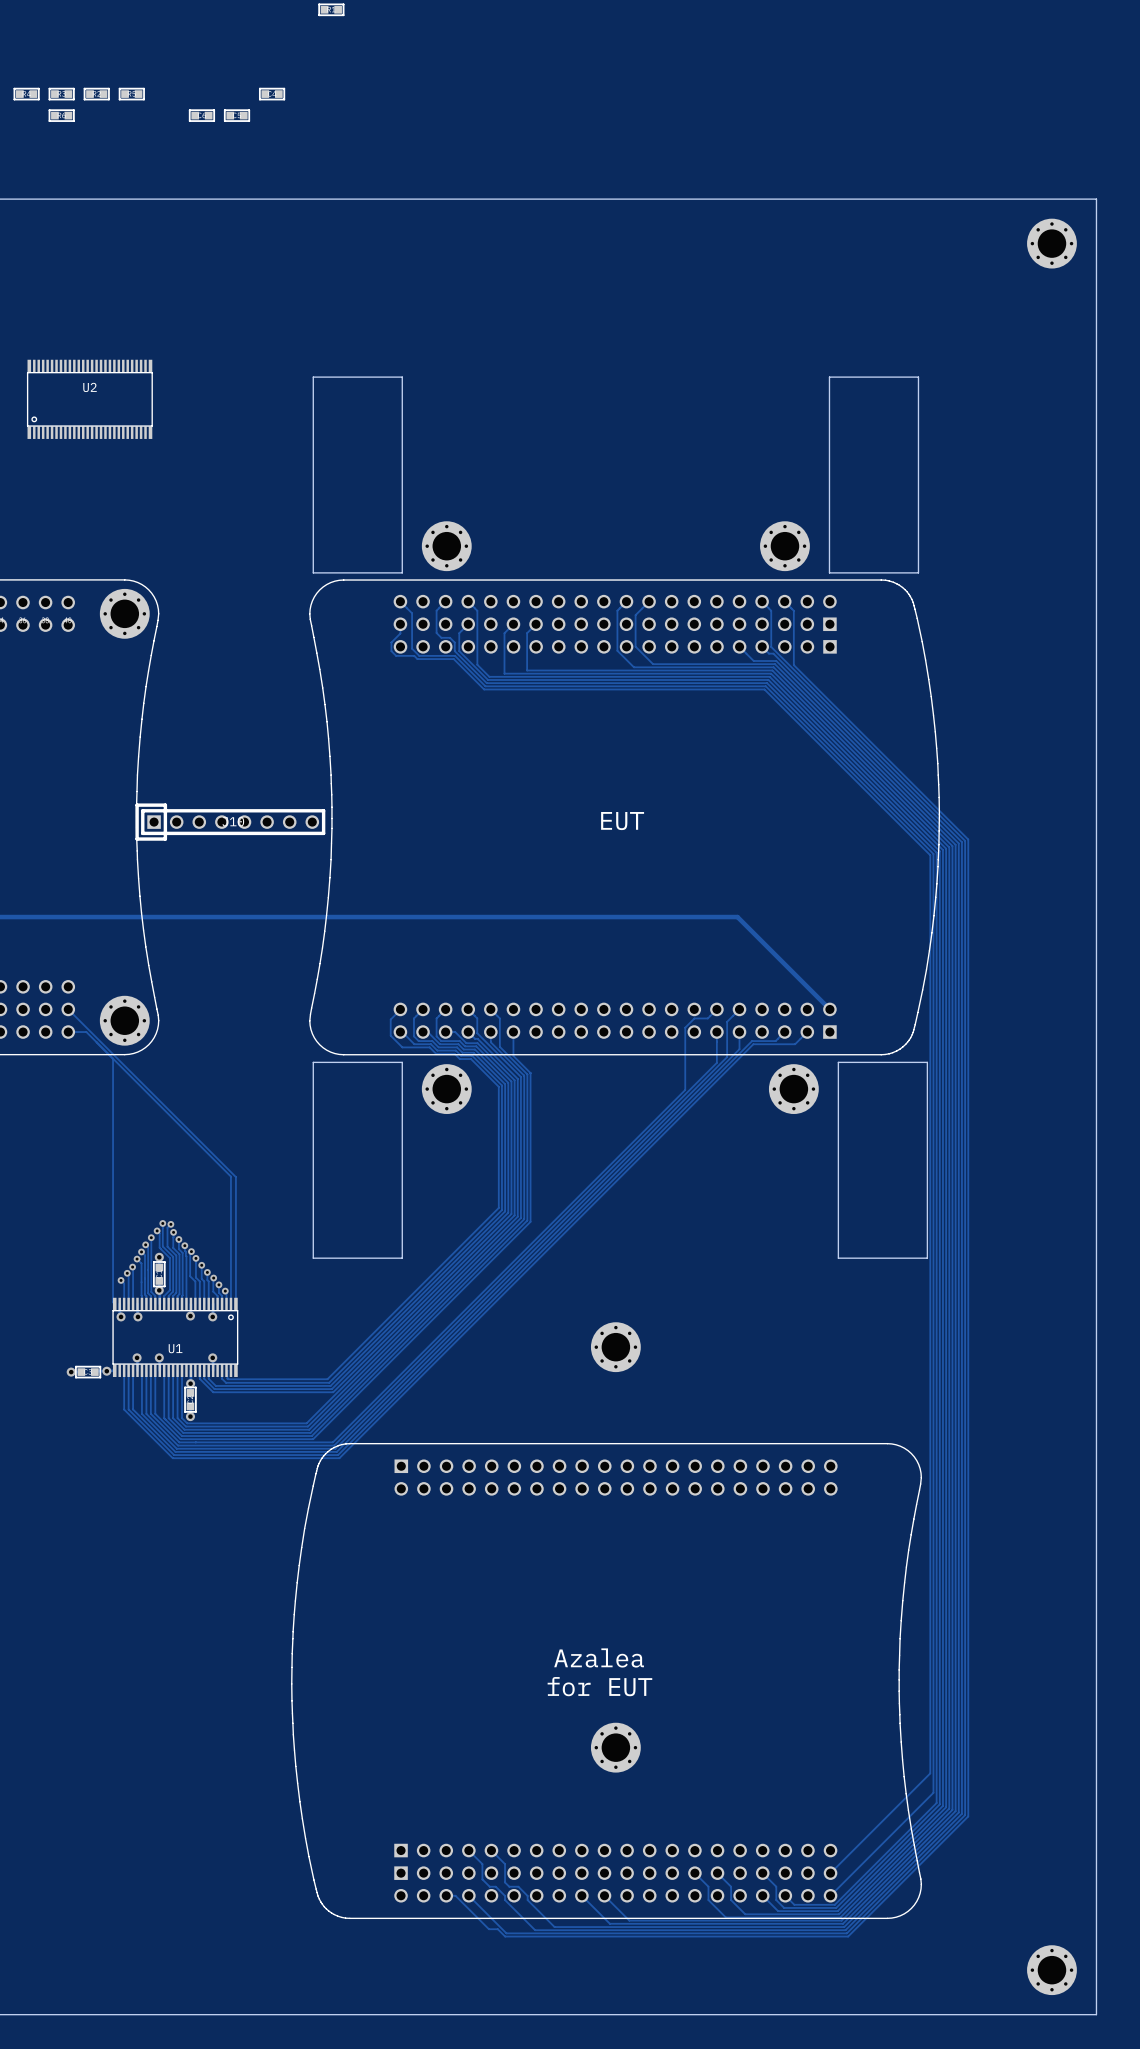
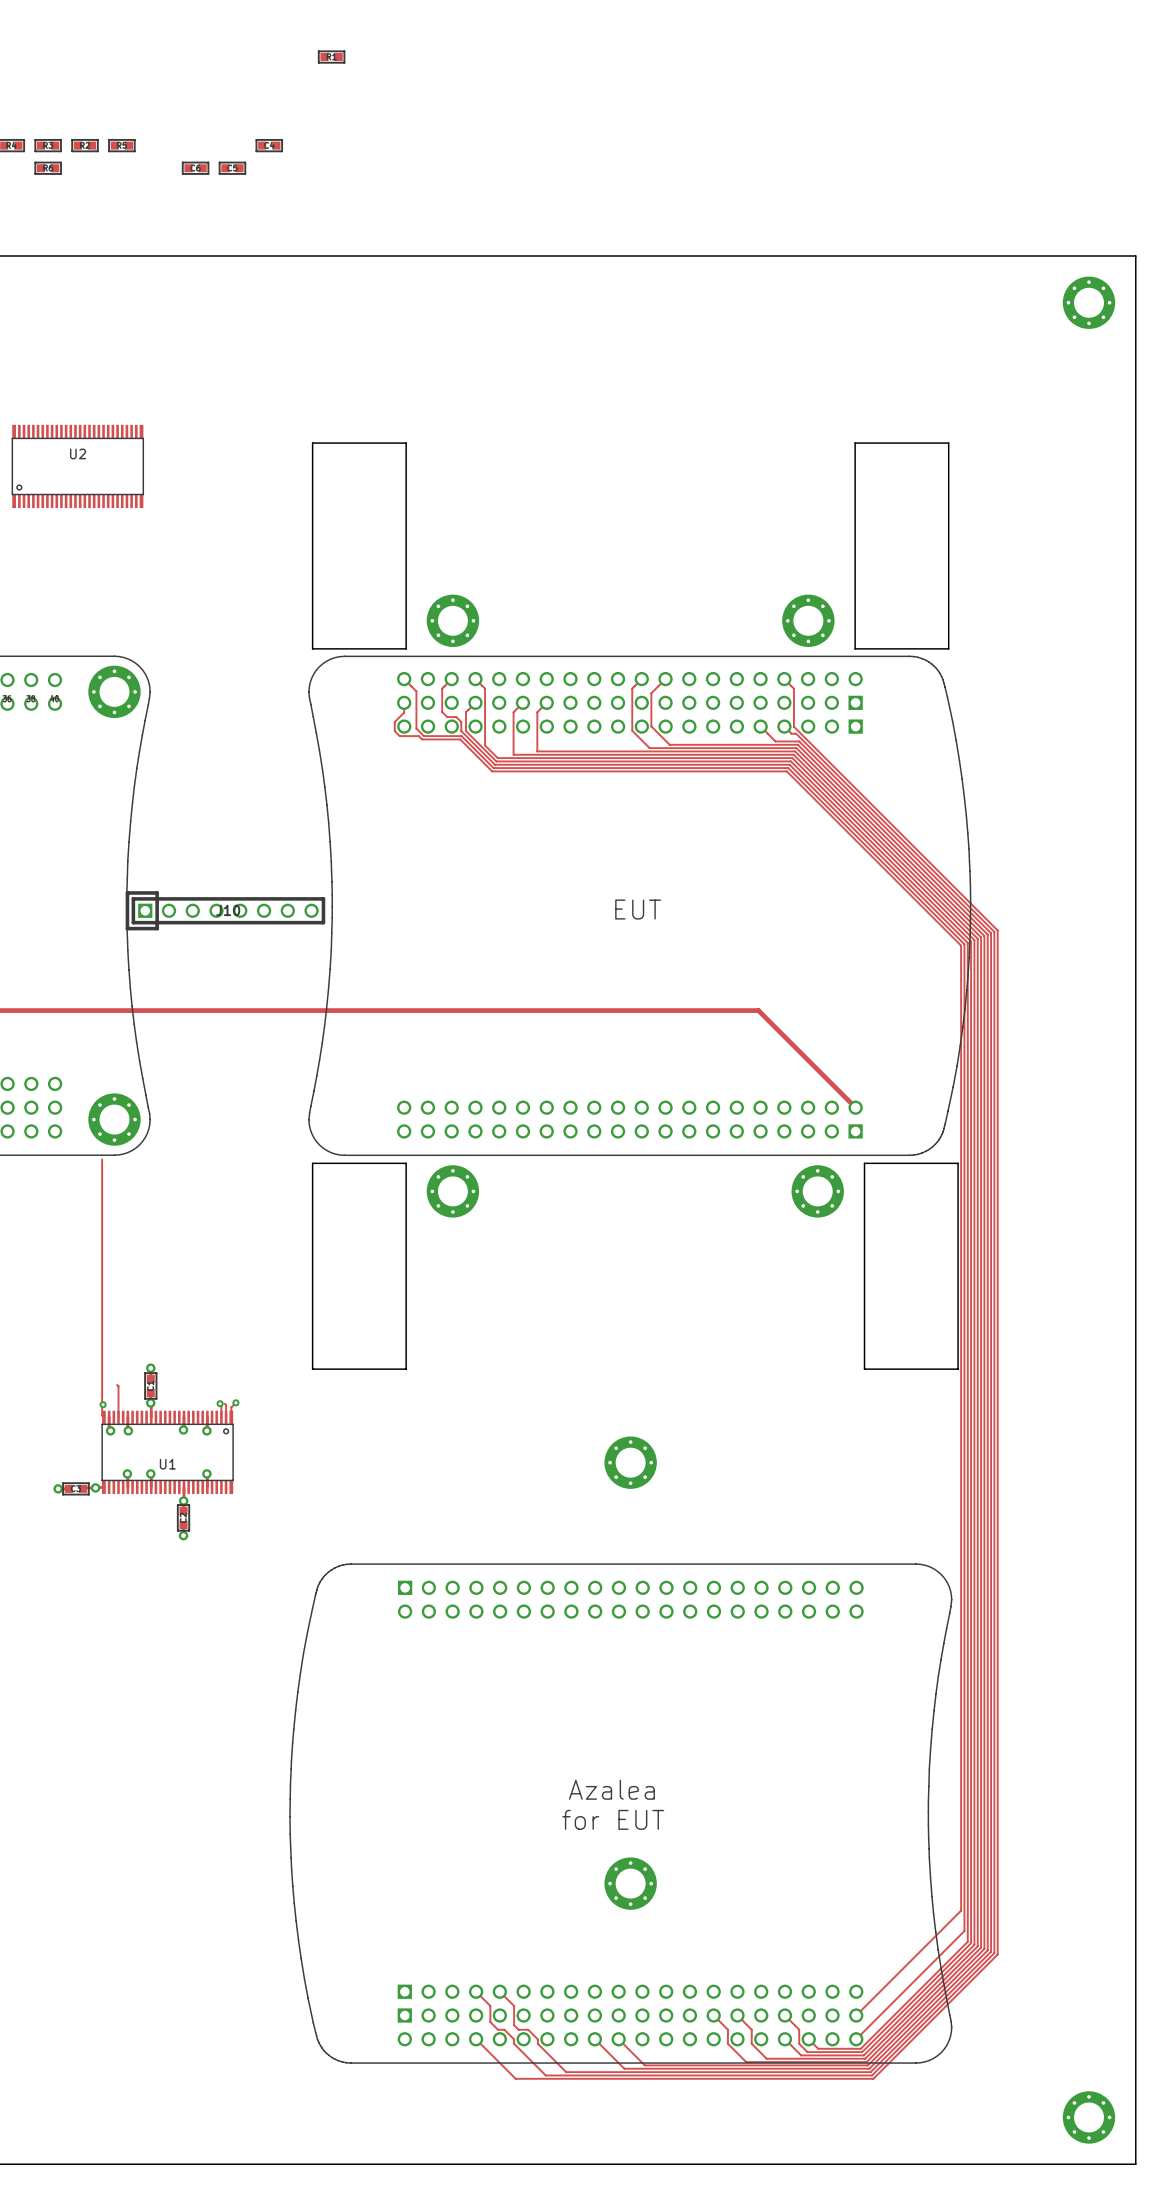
track: (784, 601) (793, 610) (793, 665) (968, 839) (968, 1816) (848, 1936) (505, 1936) (497, 1929) (488, 1929) (455, 1895) (446, 1895) -> none
track: (68, 1009) (235, 1177) (235, 1294) -> (235, 1402) (231, 1407)
track: (400, 1009) (390, 1019) (390, 1035) (402, 1047) (429, 1047) (436, 1053) (454, 1053) (459, 1059) (471, 1059) (498, 1086) (498, 1207) (327, 1379) (227, 1379) (226, 1370) -> none
track: (423, 1009) (413, 1018) (413, 1036) (418, 1041) (432, 1041) (438, 1047) (457, 1047) (462, 1052) (473, 1052) (505, 1084) (505, 1211) (330, 1385) (215, 1385) (208, 1378) (208, 1370) -> none
track: (445, 1009) (436, 1018) (436, 1036) (441, 1041) (459, 1041) (465, 1046) (476, 1046) (511, 1081) (511, 1214) (333, 1392) (213, 1392) (199, 1378) (199, 1370) -> none
track: (468, 1009) (477, 1018) (477, 1033) (520, 1076) (520, 1217) (309, 1429) (184, 1429) (173, 1418) (173, 1370) -> none
track: (490, 1009) (499, 1018) (499, 1046) (527, 1074) (527, 1220) (311, 1436) (181, 1436) (164, 1418) (164, 1370) -> none
track: (716, 1009) (707, 1018) (694, 1018) (685, 1027) (685, 1090) (332, 1442) (179, 1442) (150, 1413) (150, 1370) -> none
track: (739, 1009) (727, 1021) (727, 1057) (335, 1448) (176, 1448) (141, 1413) (141, 1370) -> none
track: (68, 1032) (86, 1032) (230, 1176) (230, 1292) -> (224, 1403) (226, 1405)
track: (400, 1032) (414, 1044) (431, 1044) (437, 1050) (455, 1050) (461, 1055) (472, 1055) (501, 1085) (501, 1210) (329, 1382) (226, 1382) (222, 1378) (222, 1370) -> none
track: (423, 1032) (427, 1032) (439, 1044) (458, 1044) (463, 1049) (474, 1049) (508, 1082) (508, 1212) (331, 1389) (214, 1389) (204, 1378) (204, 1370) -> none
track: (445, 1032) (455, 1032) (466, 1043) (477, 1043) (514, 1080) (514, 1215) (306, 1423) (187, 1423) (182, 1418) (182, 1370) -> none
track: (468, 1032) (475, 1038) (477, 1038) (517, 1078) (517, 1216) (307, 1426) (185, 1426) (177, 1418) (177, 1370) -> none
track: (490, 1032) (490, 1042) (524, 1075) (524, 1219) (310, 1432) (183, 1432) (168, 1418) (168, 1370) -> none
track: (513, 1032) (513, 1055) (530, 1073) (530, 1221) (313, 1439) (180, 1439) (155, 1413) (155, 1370) -> none
track: (716, 1032) (716, 1062) (334, 1445) (178, 1445) (146, 1413) (146, 1370) -> none
track: (739, 1032) (739, 1049) (336, 1451) (175, 1451) (133, 1409) (133, 1370) -> none
track: (784, 1032) (775, 1041) (752, 1041) (338, 1455) (174, 1455) (128, 1409) (128, 1370) -> none
track: (807, 1032) (795, 1044) (753, 1044) (339, 1458) (172, 1458) (124, 1409) (124, 1370) -> none
track: (162, 1223) (162, 1246) (173, 1256) (173, 1291) (168, 1296) (168, 1304) -> none
via: (162, 1223) -> none
track: (170, 1224) (167, 1227) (167, 1246) (176, 1255) (176, 1292) (173, 1296) (173, 1304) -> none
via: (170, 1224) -> none
track: (157, 1230) (159, 1233) (159, 1247) (169, 1258) (169, 1290) (164, 1295) (164, 1304) -> none
via: (157, 1230) -> none
track: (173, 1232) (173, 1248) (179, 1254) (179, 1294) (177, 1296) (177, 1304) -> none
via: (173, 1232) -> none
track: (151, 1237) (151, 1292) (155, 1296) (155, 1304) -> none
via: (151, 1237) -> none
track: (178, 1239) (178, 1249) (182, 1252) (182, 1304) -> none
via: (178, 1239) -> none
track: (145, 1244) (148, 1247) (148, 1293) (150, 1296) (150, 1304) -> none
via: (145, 1244) -> none
track: (184, 1245) (185, 1252) -> none
via: (184, 1245) -> none
track: (141, 1251) (144, 1255) (146, 1304) -> none
via: (141, 1251) -> none
track: (191, 1251) (190, 1276) (195, 1281) (195, 1304) -> none
via: (191, 1251) -> none
track: (185, 1252) (186, 1304) -> none
track: (195, 1258) (195, 1277) (199, 1281) (199, 1304) -> none
via: (195, 1258) -> none
track: (137, 1259) (141, 1263) (141, 1304) -> none
via: (137, 1259) -> none
track: (201, 1265) (204, 1304) -> none
via: (201, 1265) -> none
track: (132, 1267) (133, 1304) -> none
via: (132, 1267) -> none
track: (207, 1272) (208, 1304) -> none
via: (207, 1272) -> none
via: (127, 1273) -> none
track: (213, 1278) (213, 1291) (217, 1296) (217, 1304) -> none
via: (213, 1278) -> none
track: (121, 1280) (124, 1283) (124, 1304) -> none
via: (121, 1280) -> none
track: (218, 1284) (222, 1304) -> none
via: (218, 1284) -> none
via: none -> (235, 1402)
via: none -> (103, 1404)

